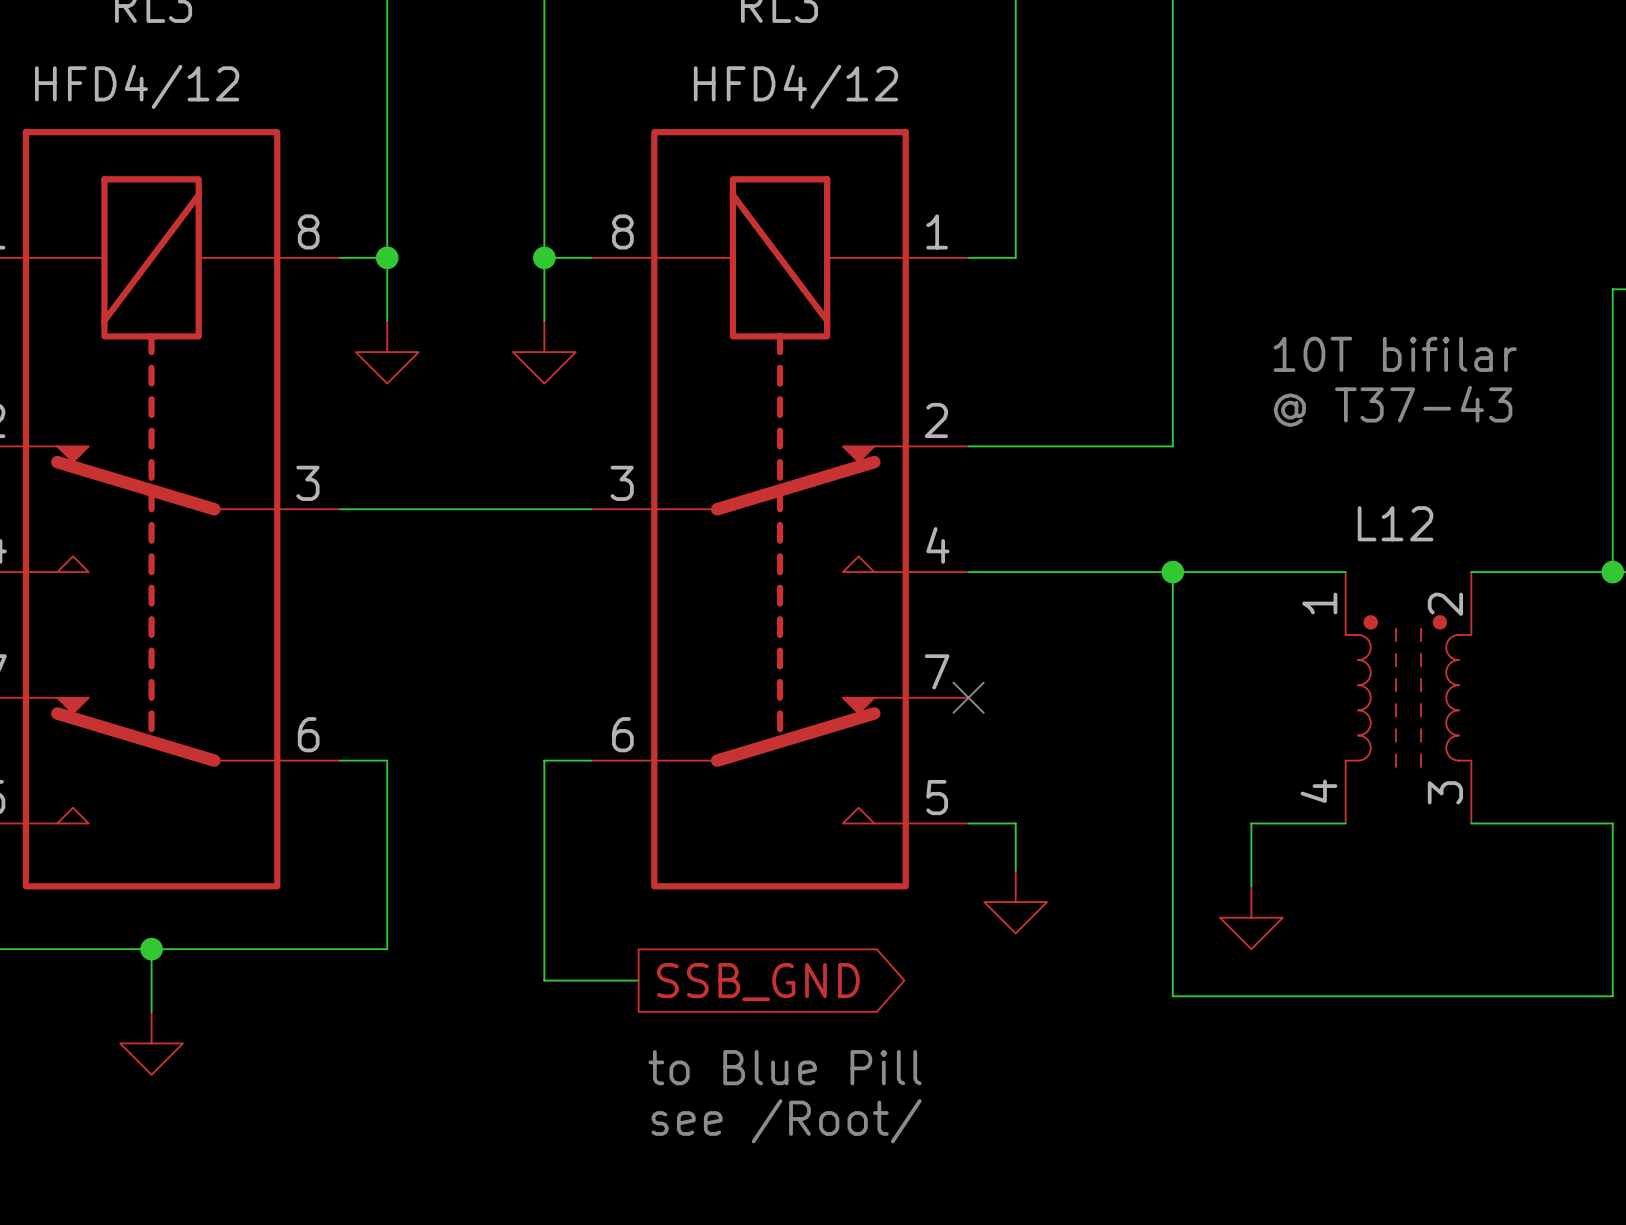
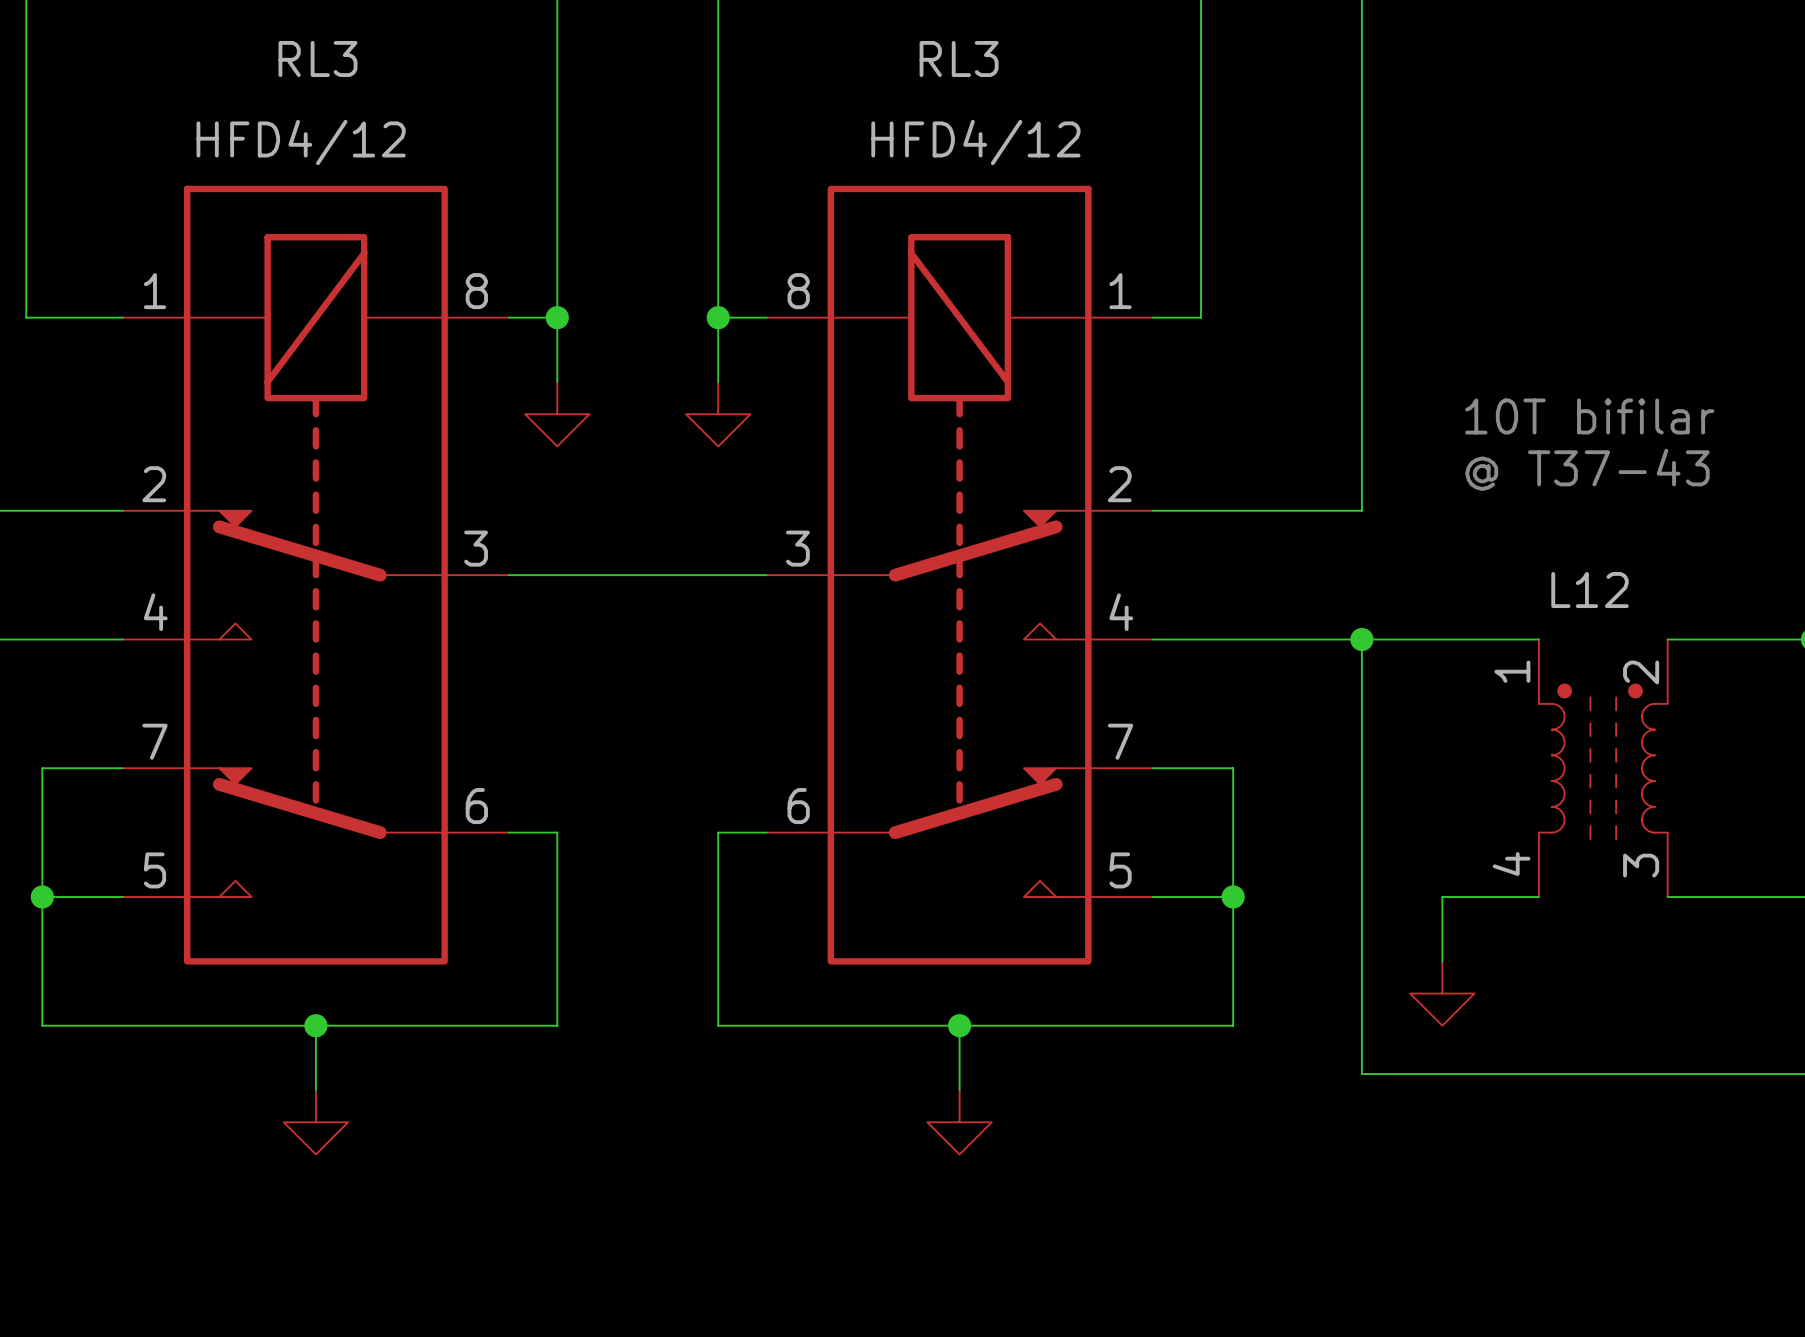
no-connect mark: (968, 697) -> none
wire: (1015, 823) (1015, 870) -> (1200, 896) (1233, 896)
junction: none -> (1233, 896)
power symbol position: (1015, 902) -> (959, 1122)
wire: (544, 949) (544, 980) (638, 980) -> (718, 1025) (1233, 1025) (1233, 768) (1152, 768)
wire: none -> (959, 1025) (959, 1090)
junction: none -> (959, 1025)
global label: SSB_GND (758, 982) -> none
text: to Blue Pill (785, 1067) -> none
text: see /Root/ (786, 1121) -> none

